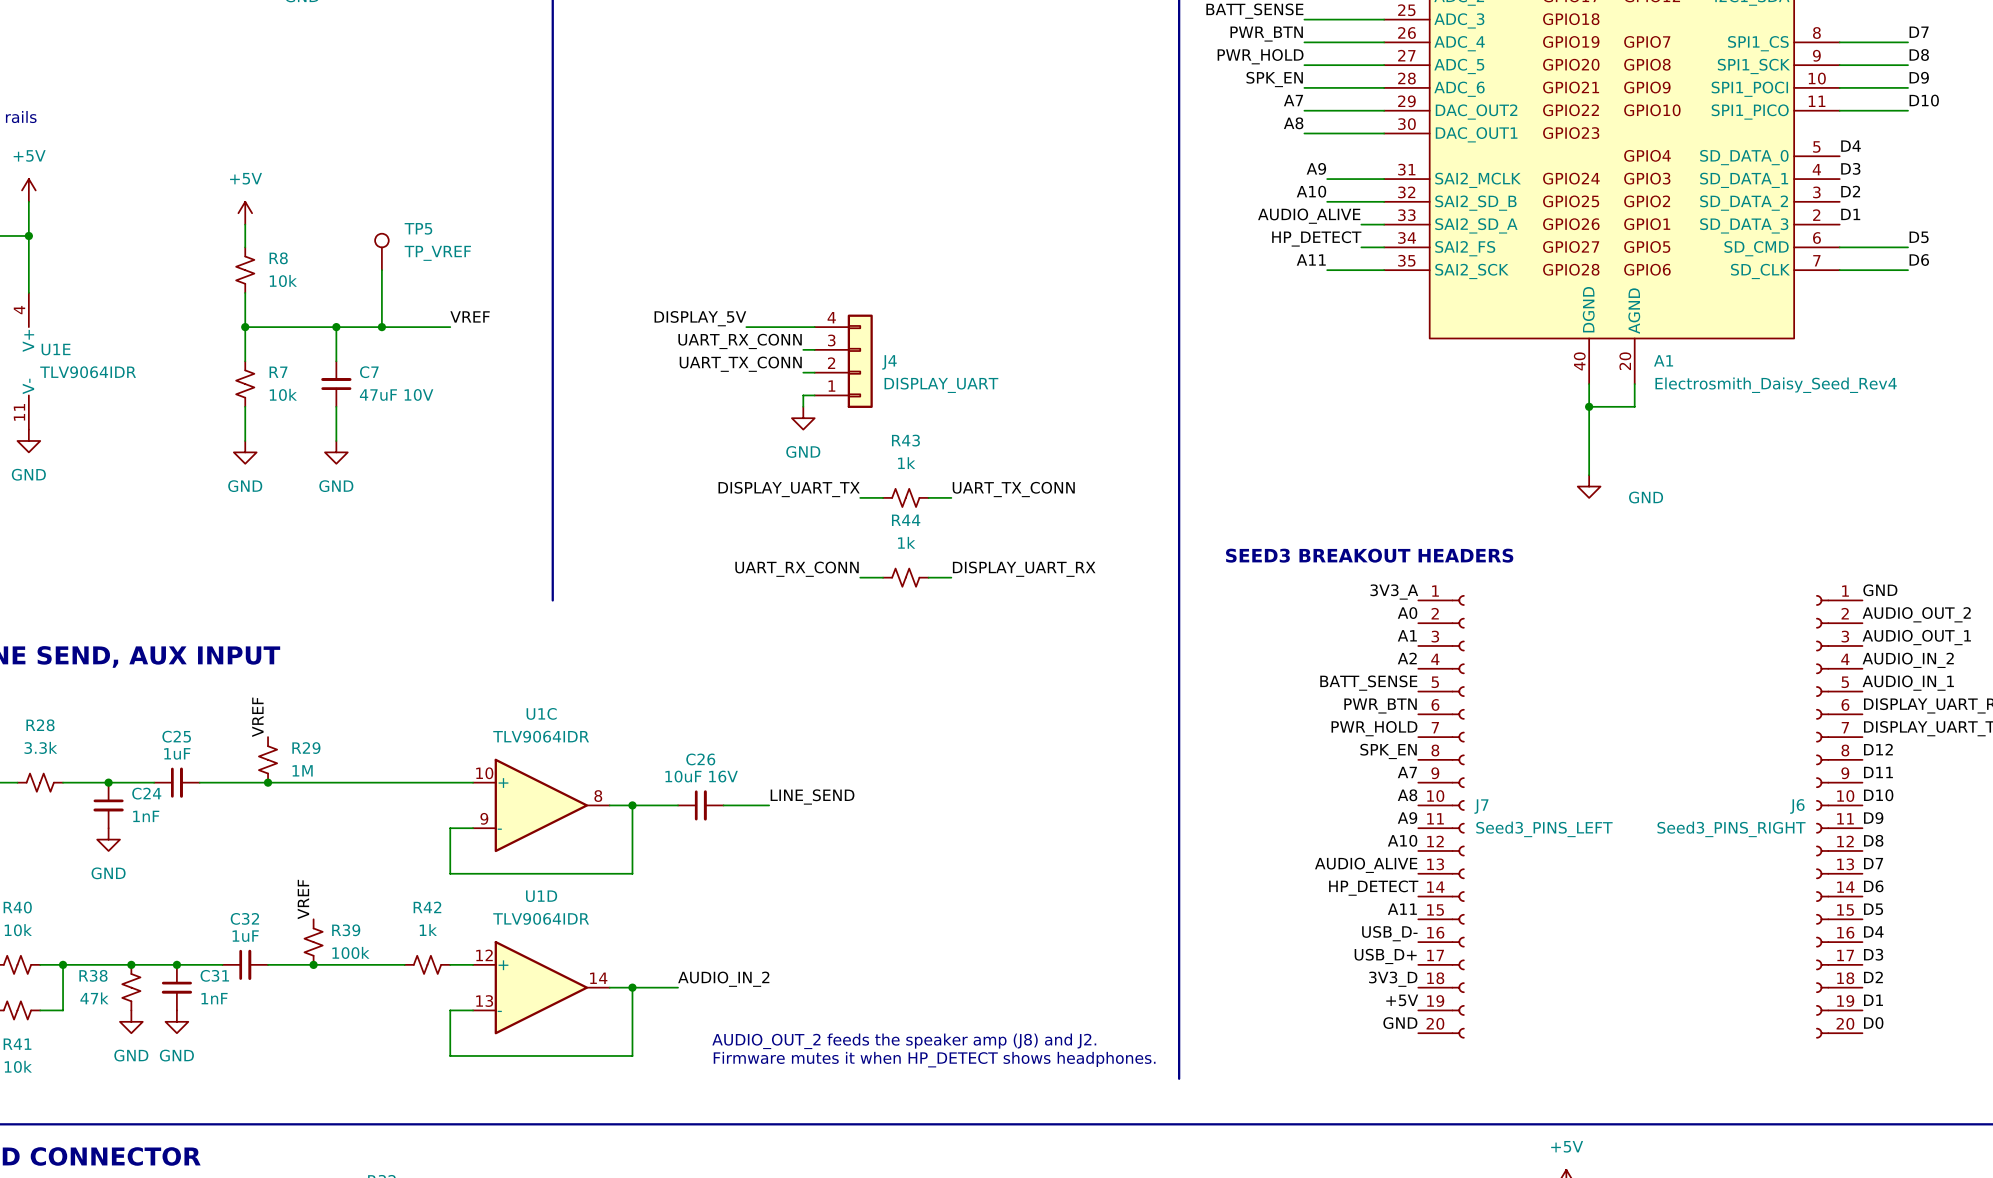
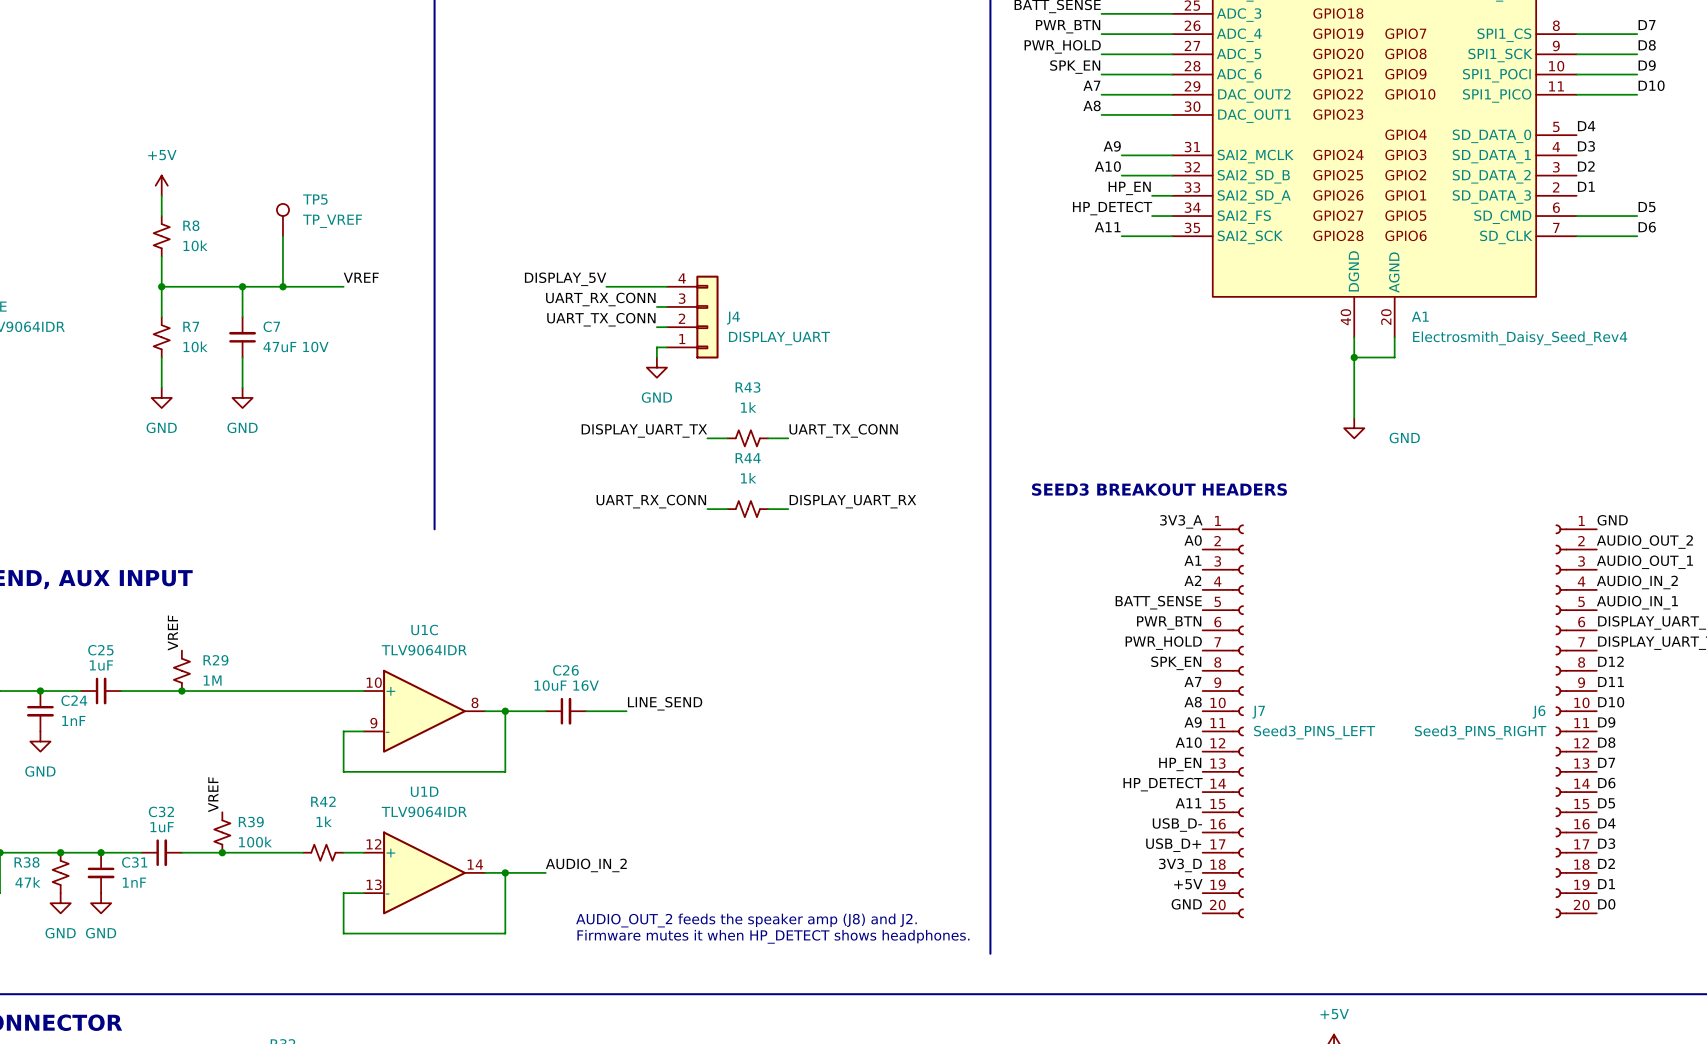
label: AUDIO_ALIVE (1309, 216) -> HP_EN (1129, 188)
label: AUDIO_ALIVE (1366, 865) -> HP_EN (1180, 764)

